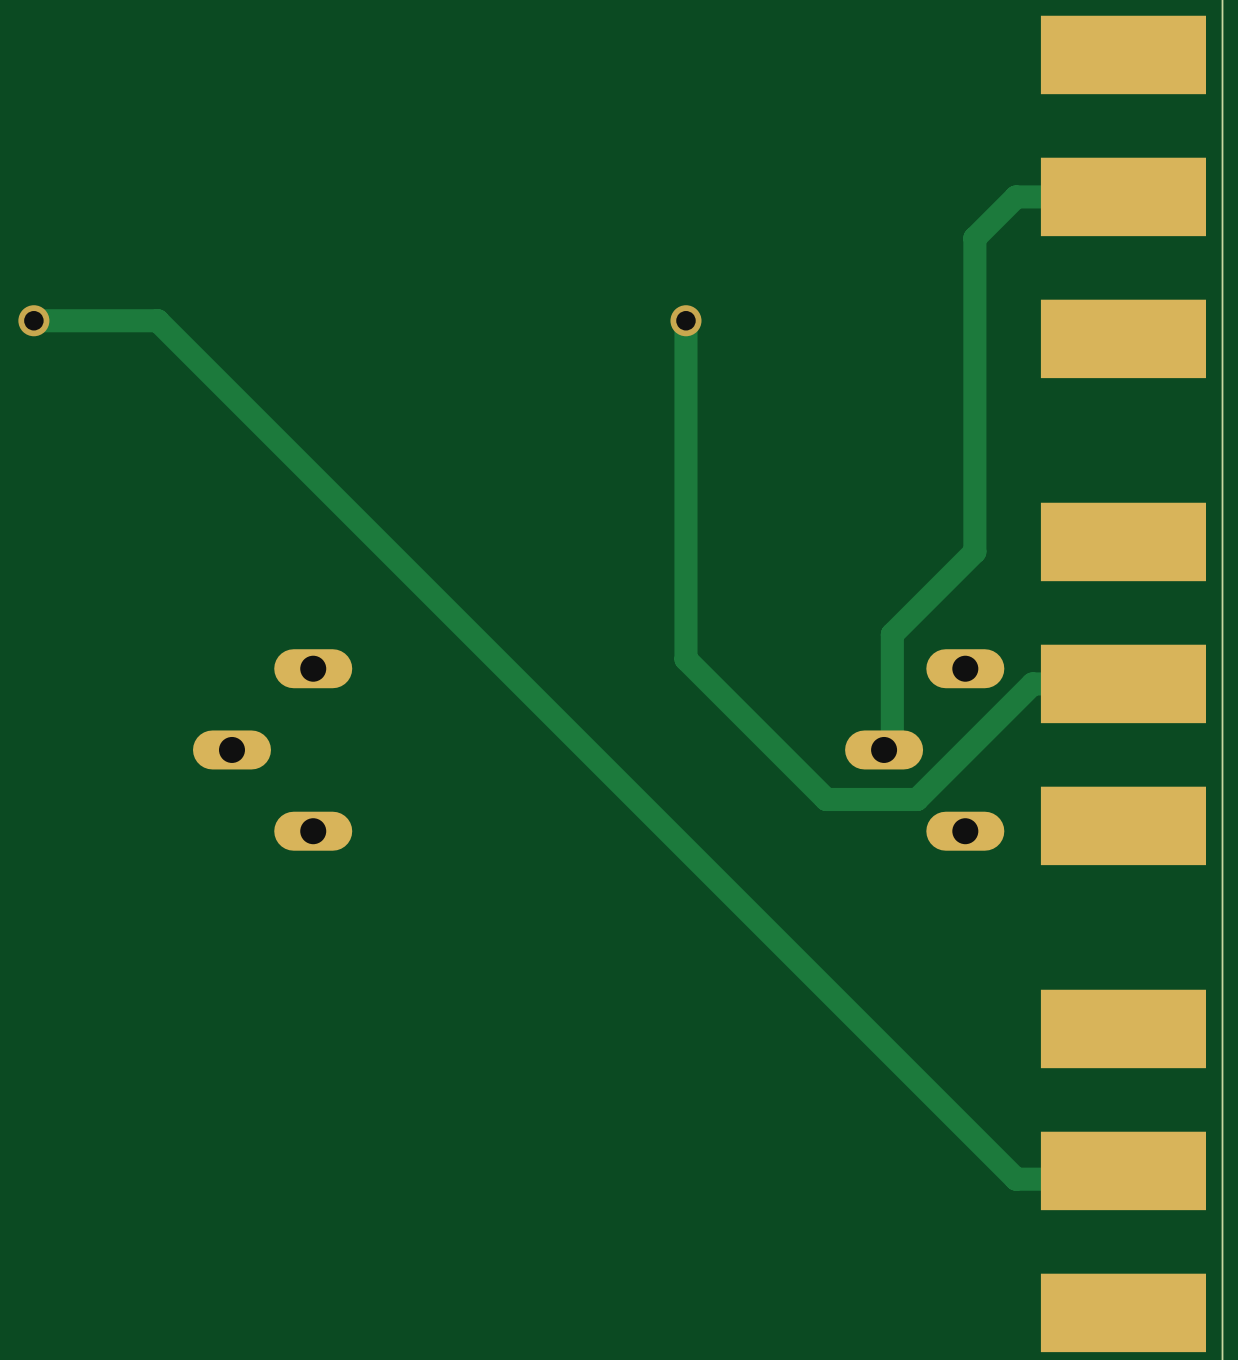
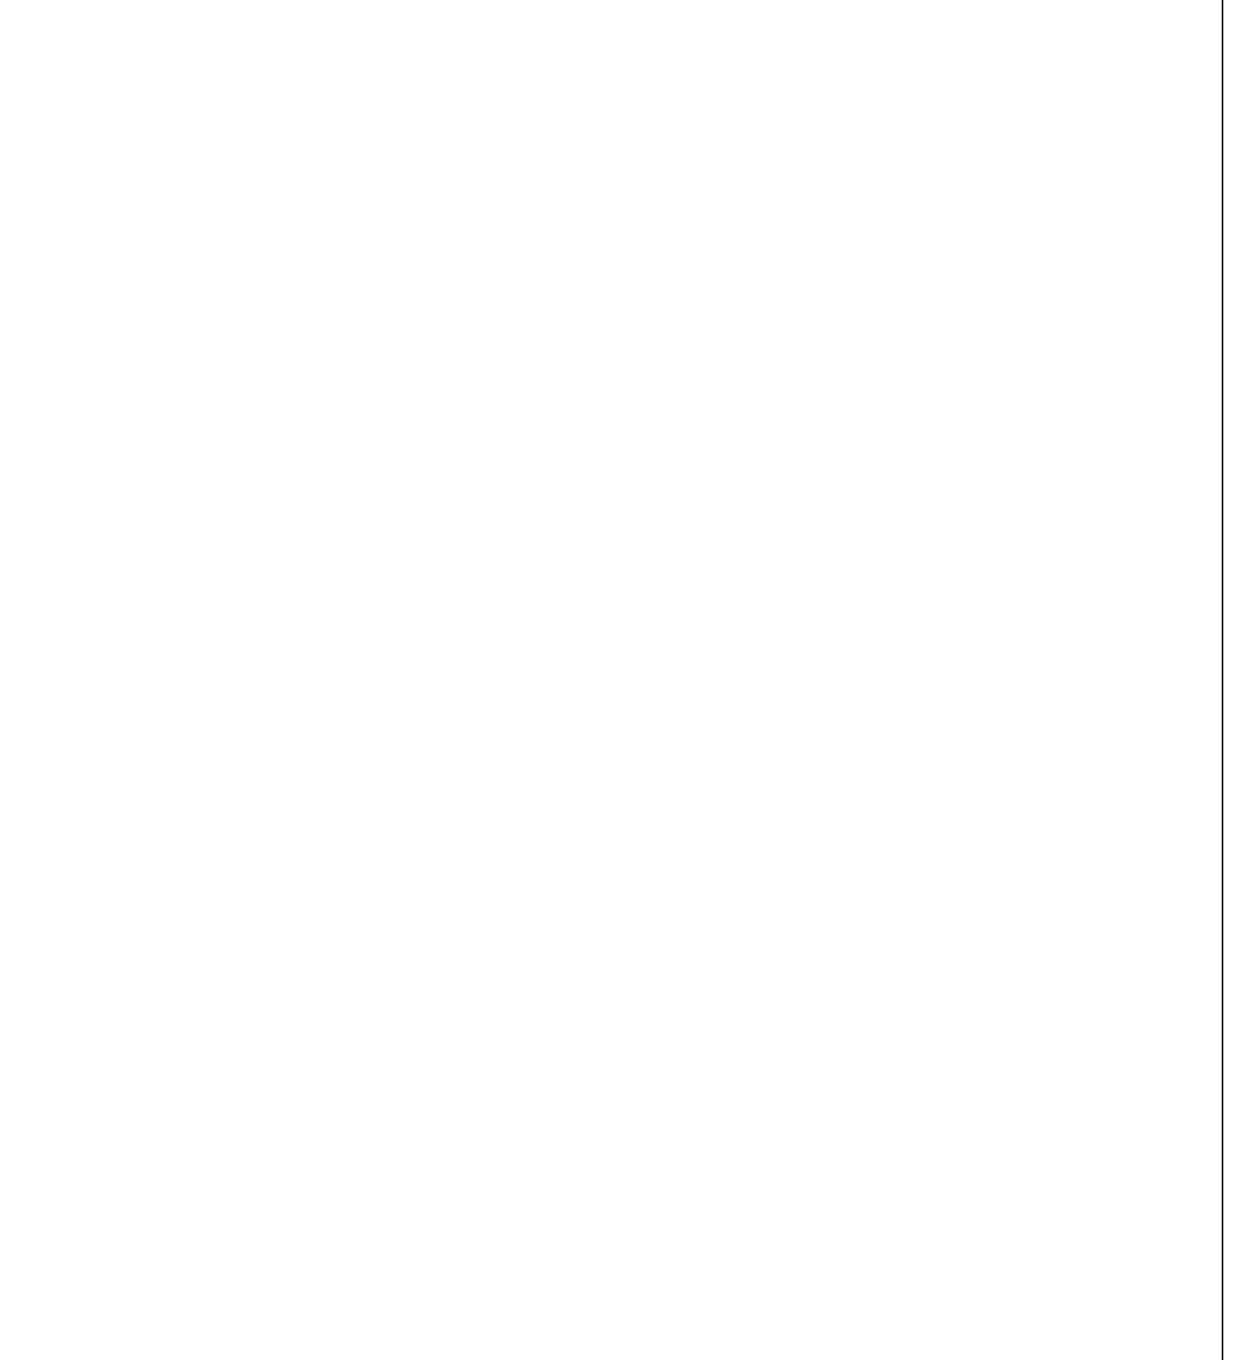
track: (1123, 196) (1016, 196) (974, 238) (974, 551) (892, 634) (892, 741) (884, 749) -> none
part: (1123, 196) -> none
track: (33, 320) (157, 320) (1016, 1179) (1115, 1179) (1123, 1170) -> none
via: (33, 320) -> none
track: (685, 320) (685, 659) (826, 799) (917, 799) (1032, 683) (1123, 683) -> none
via: (685, 320) -> none
part: (1123, 683) -> none
part: (272, 749) -> none
part: (924, 749) -> none
part: (1123, 1170) -> none

